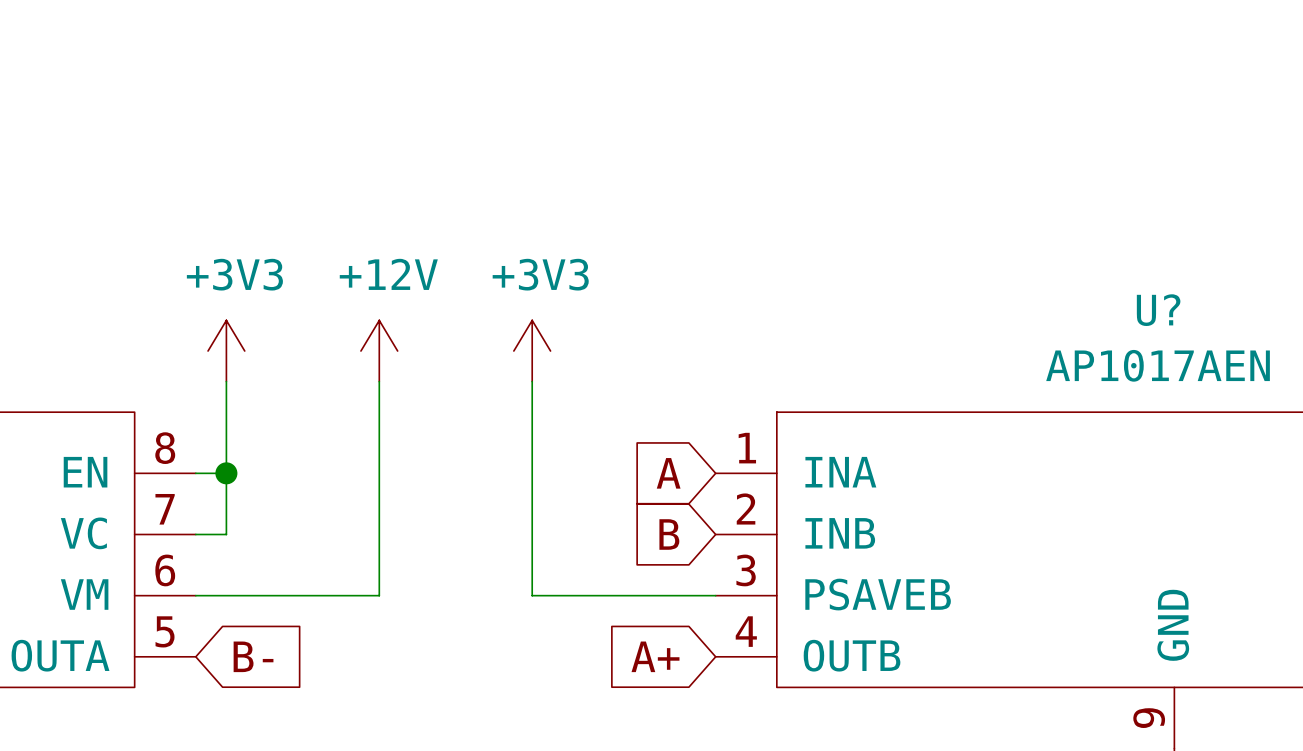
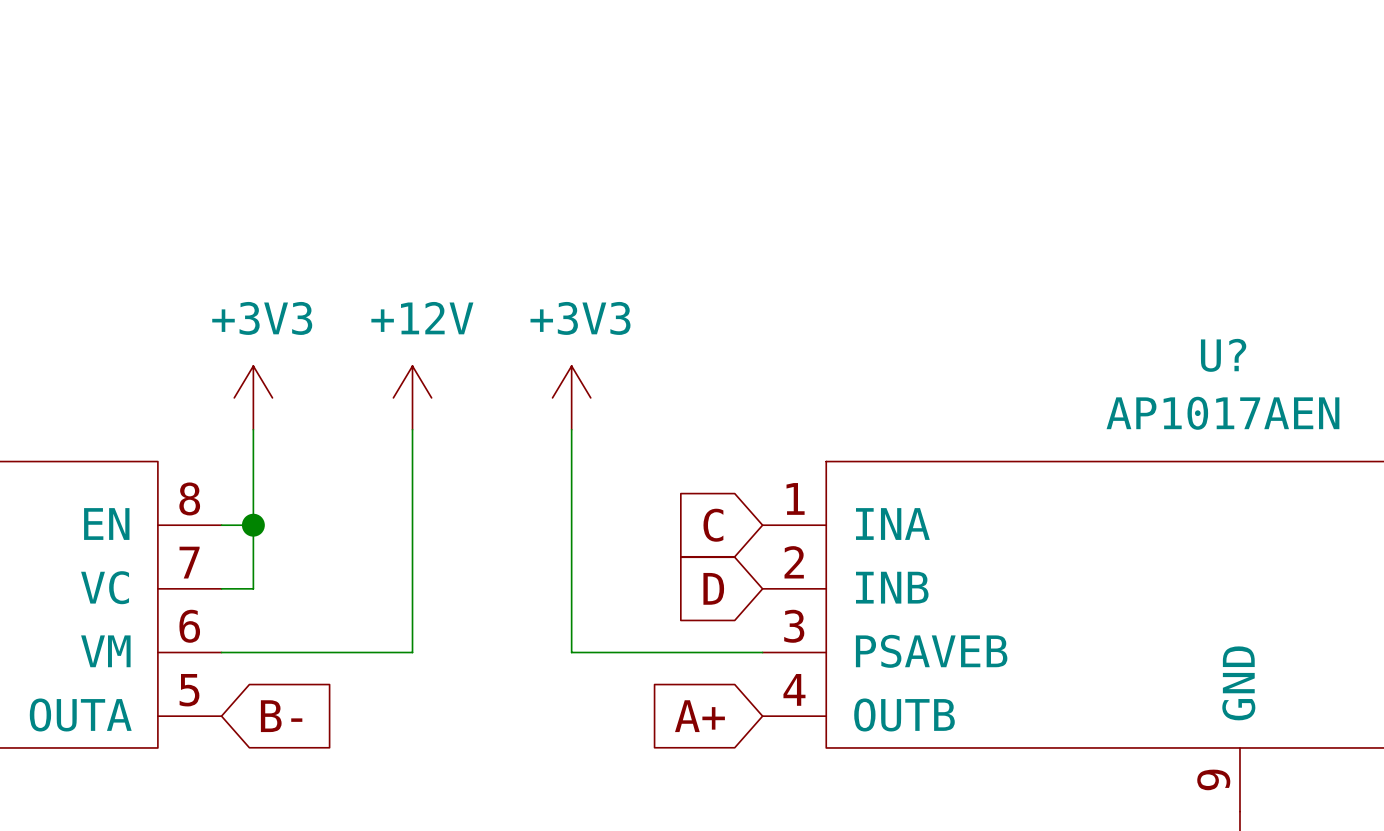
global label: A (668, 473) -> C (713, 525)
global label: B (669, 534) -> D (713, 588)

